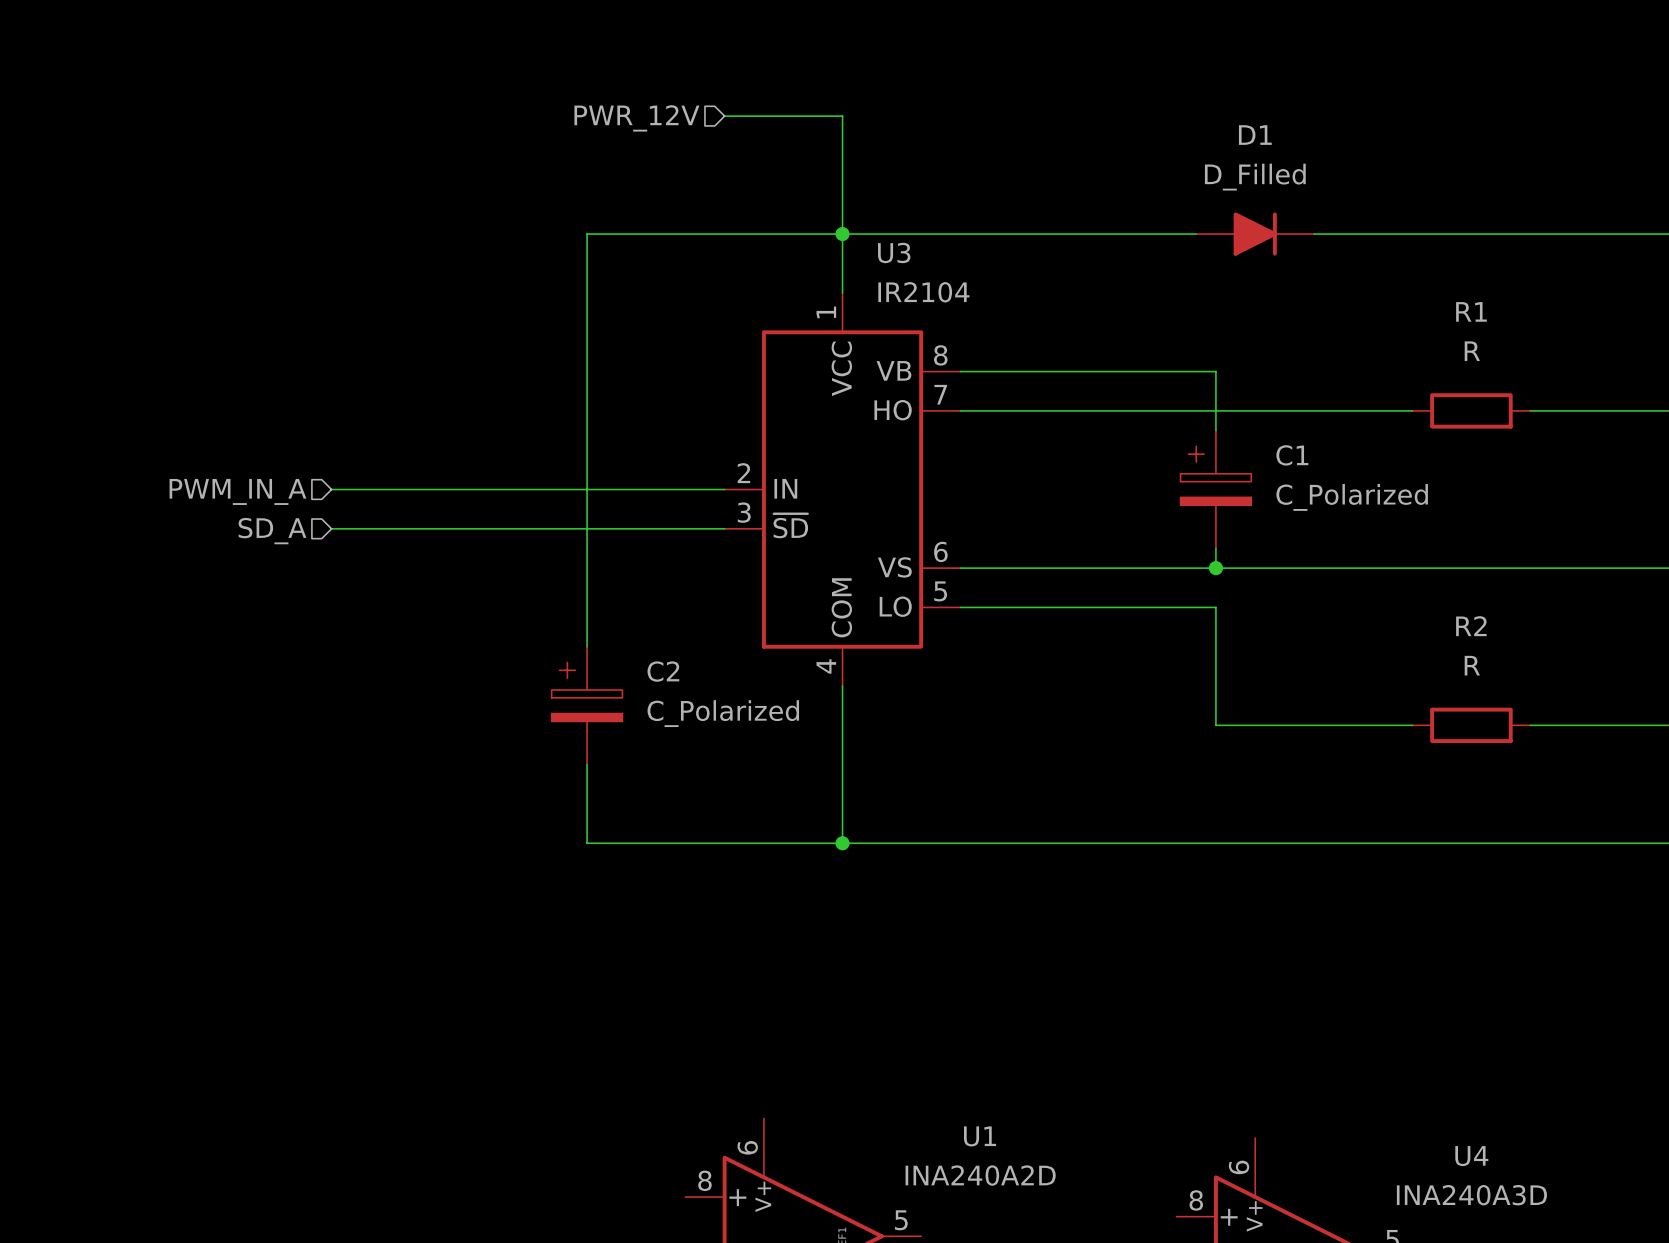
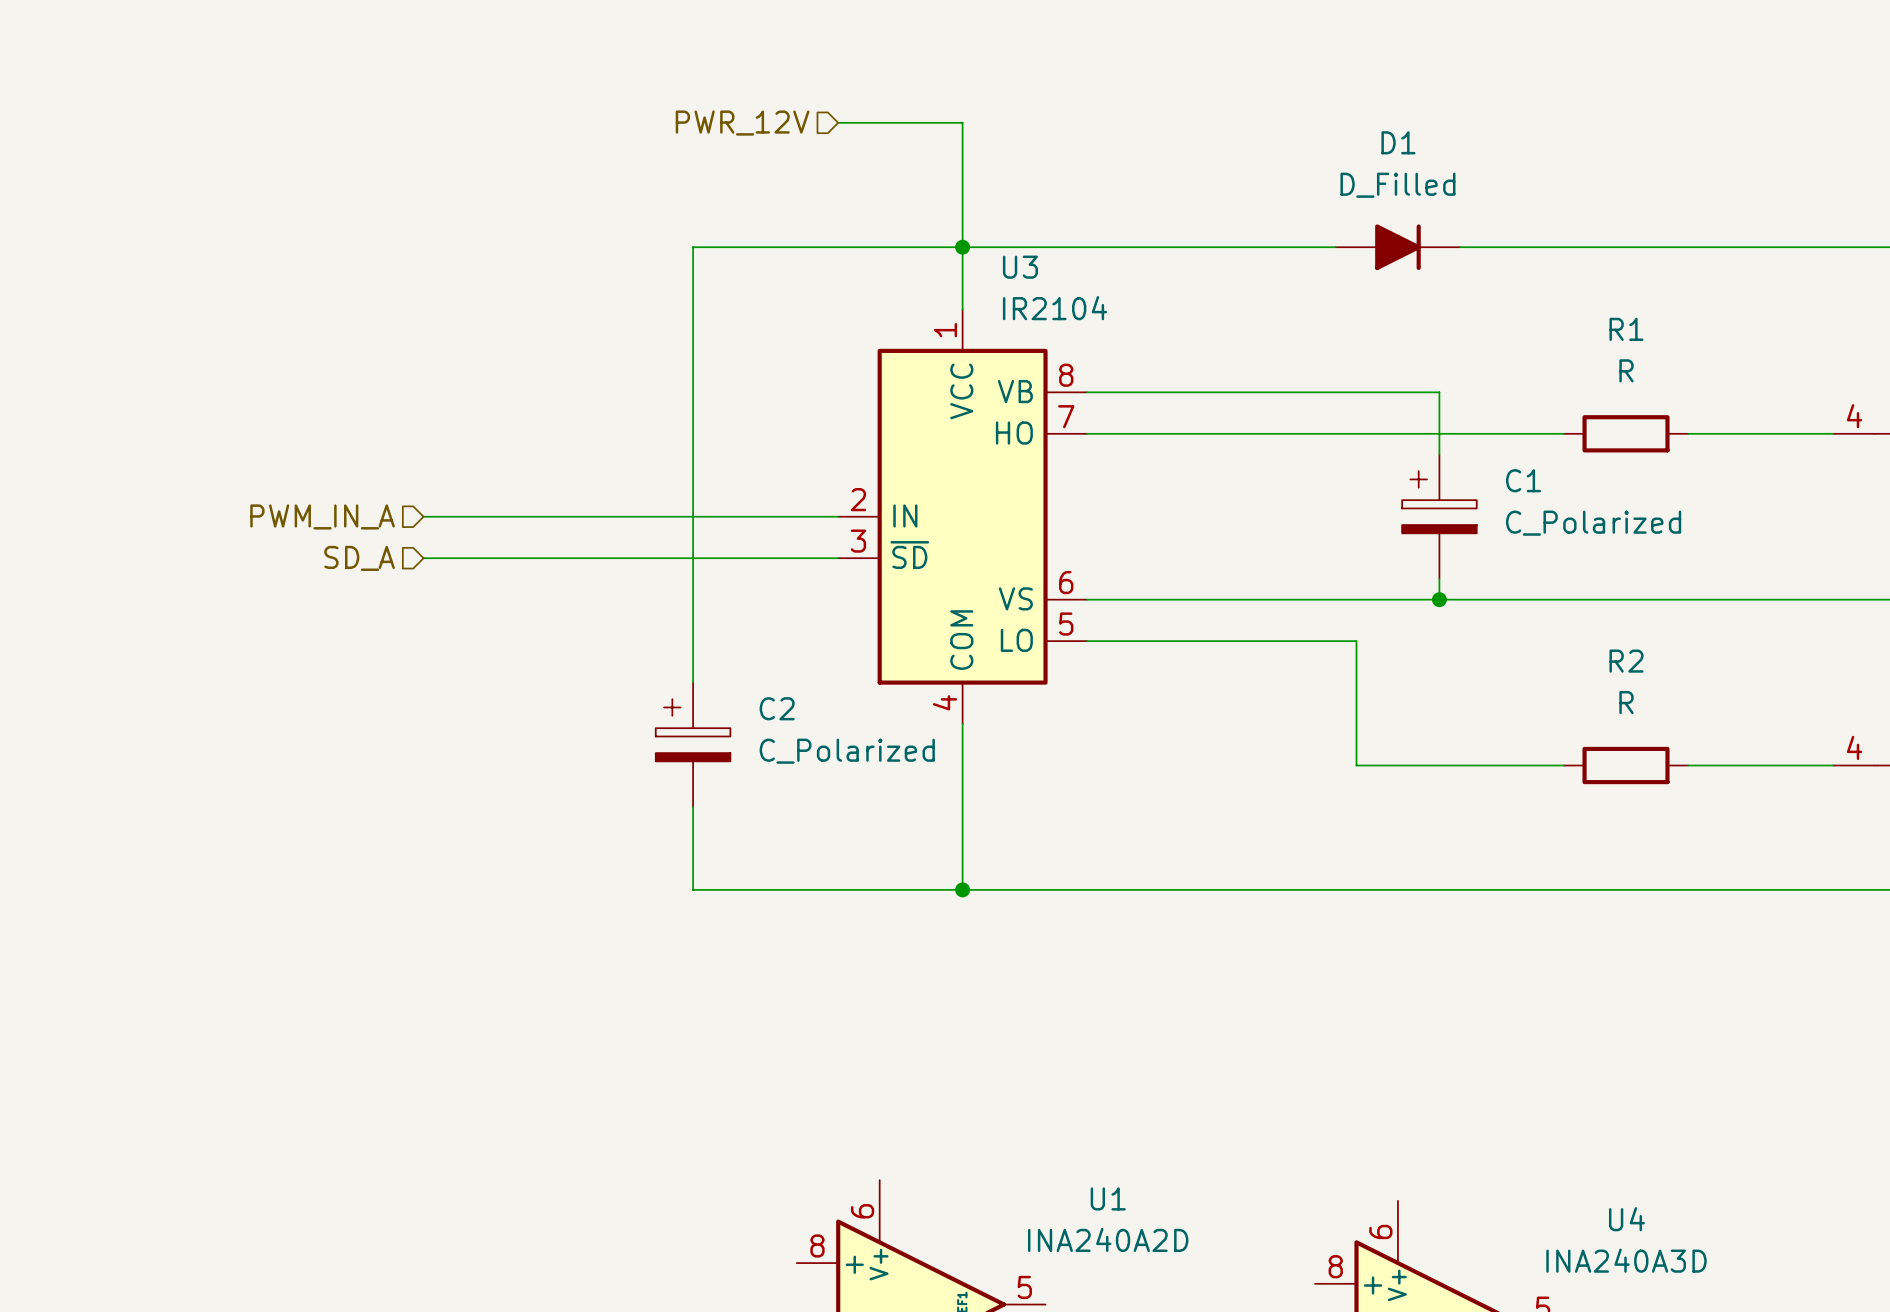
wire: (1215, 371) (1215, 430) -> (1356, 392) (1439, 392) (1439, 454)
C1 position: (1215, 489) -> (1439, 516)
wire: (1215, 548) (1215, 568) -> (1439, 578) (1439, 599)
junction position: (1215, 568) -> (1439, 599)

